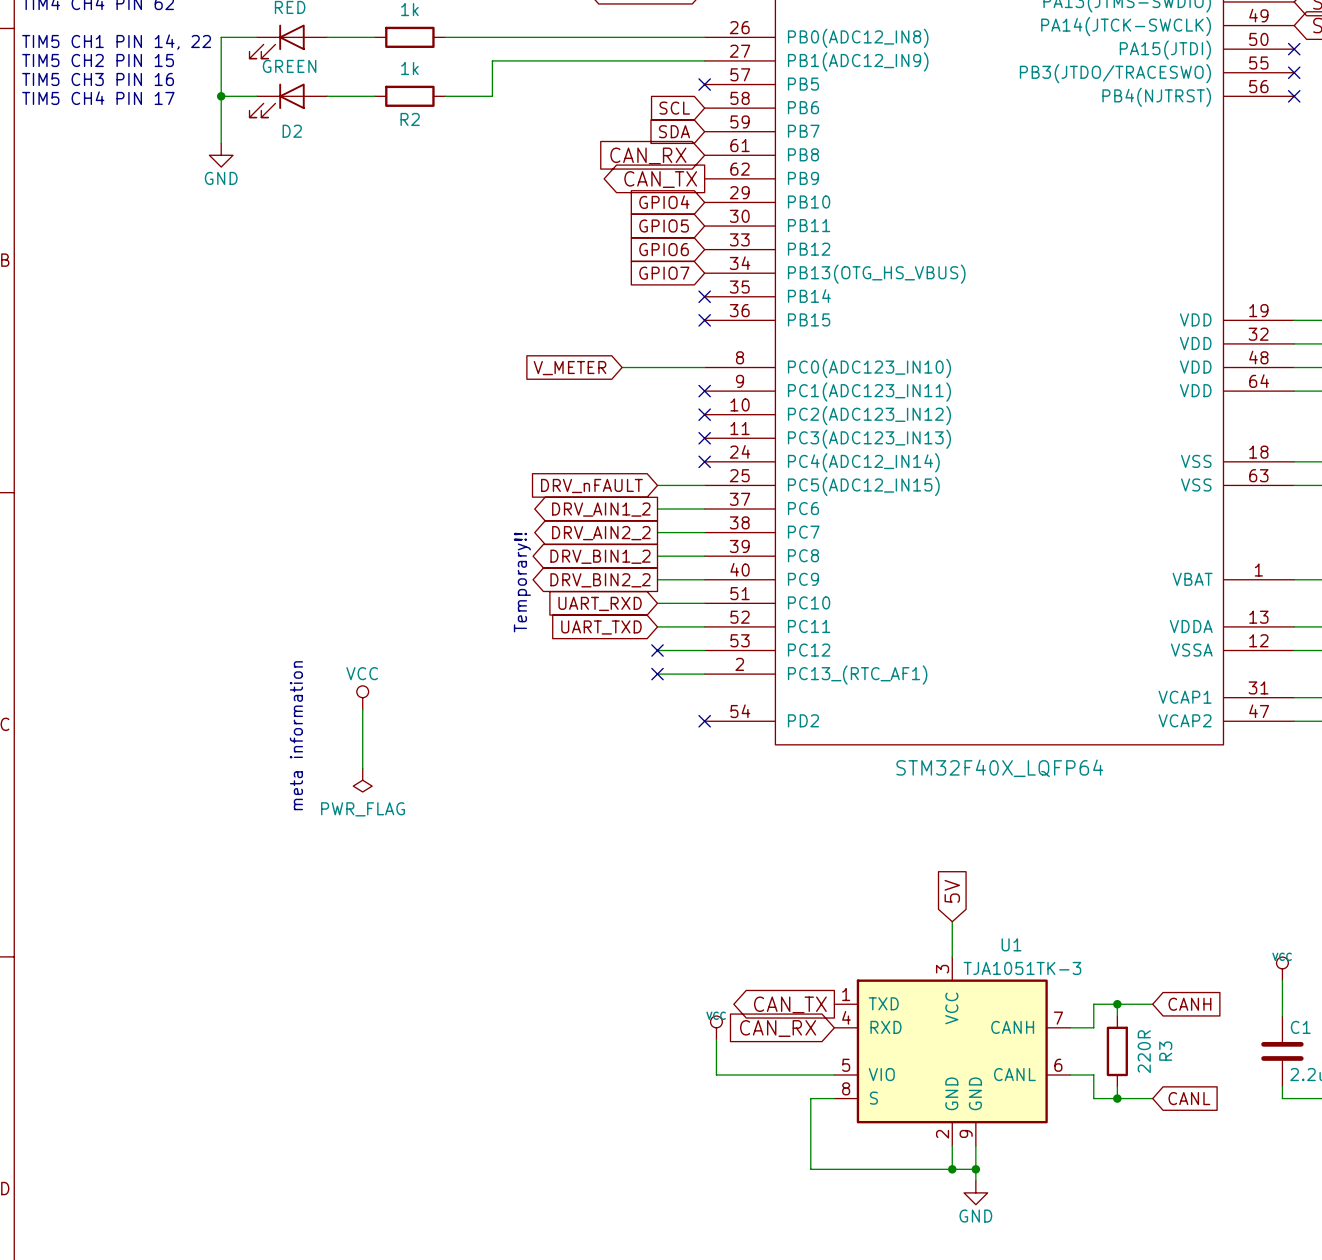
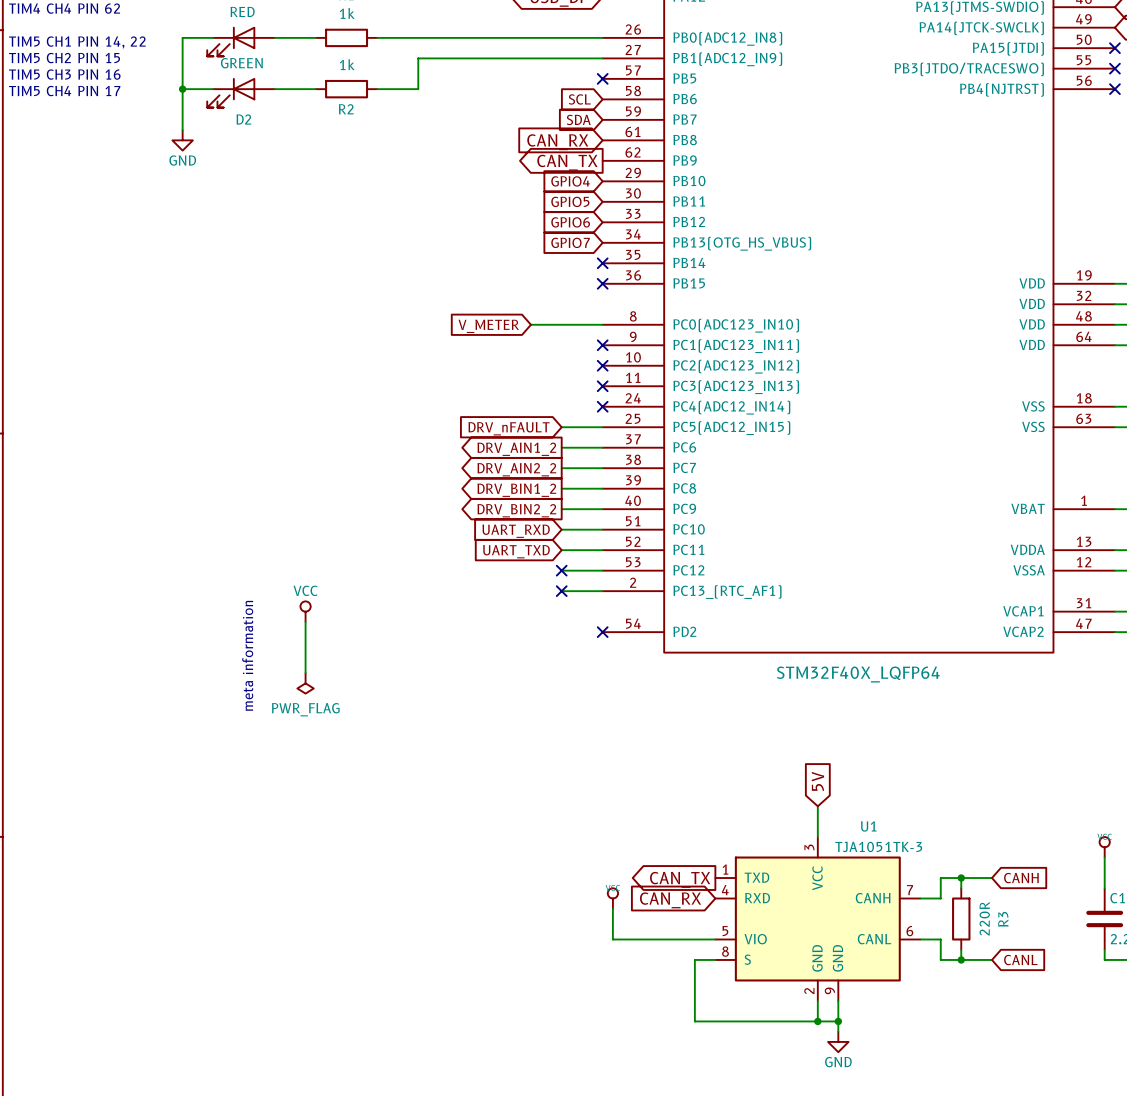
text: Temporary!! (522, 582) -> none

